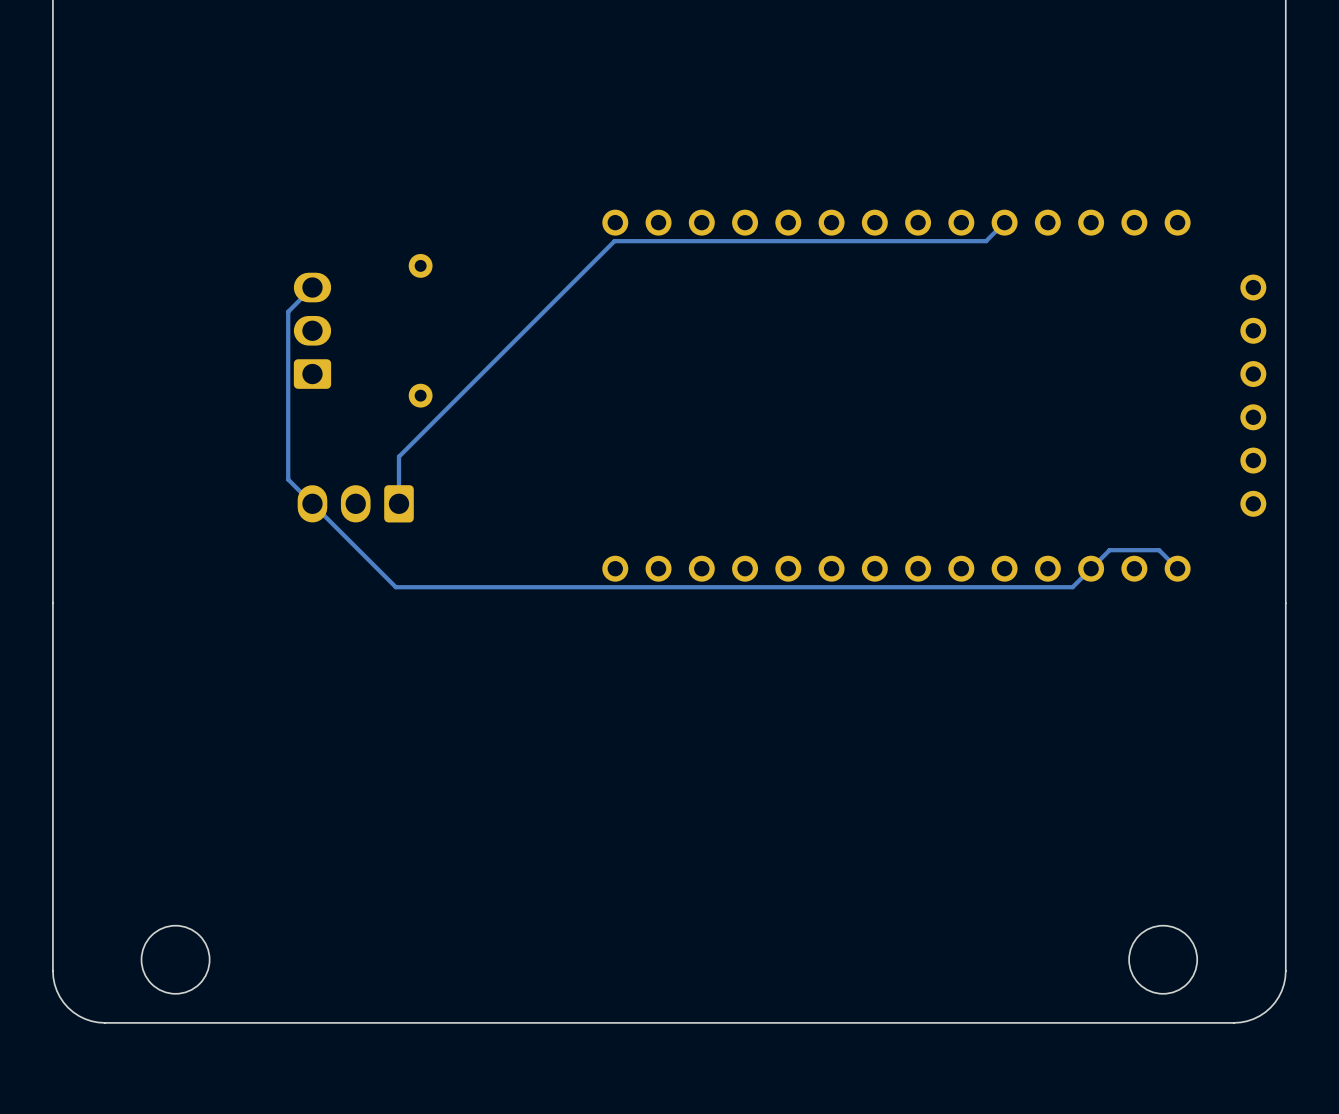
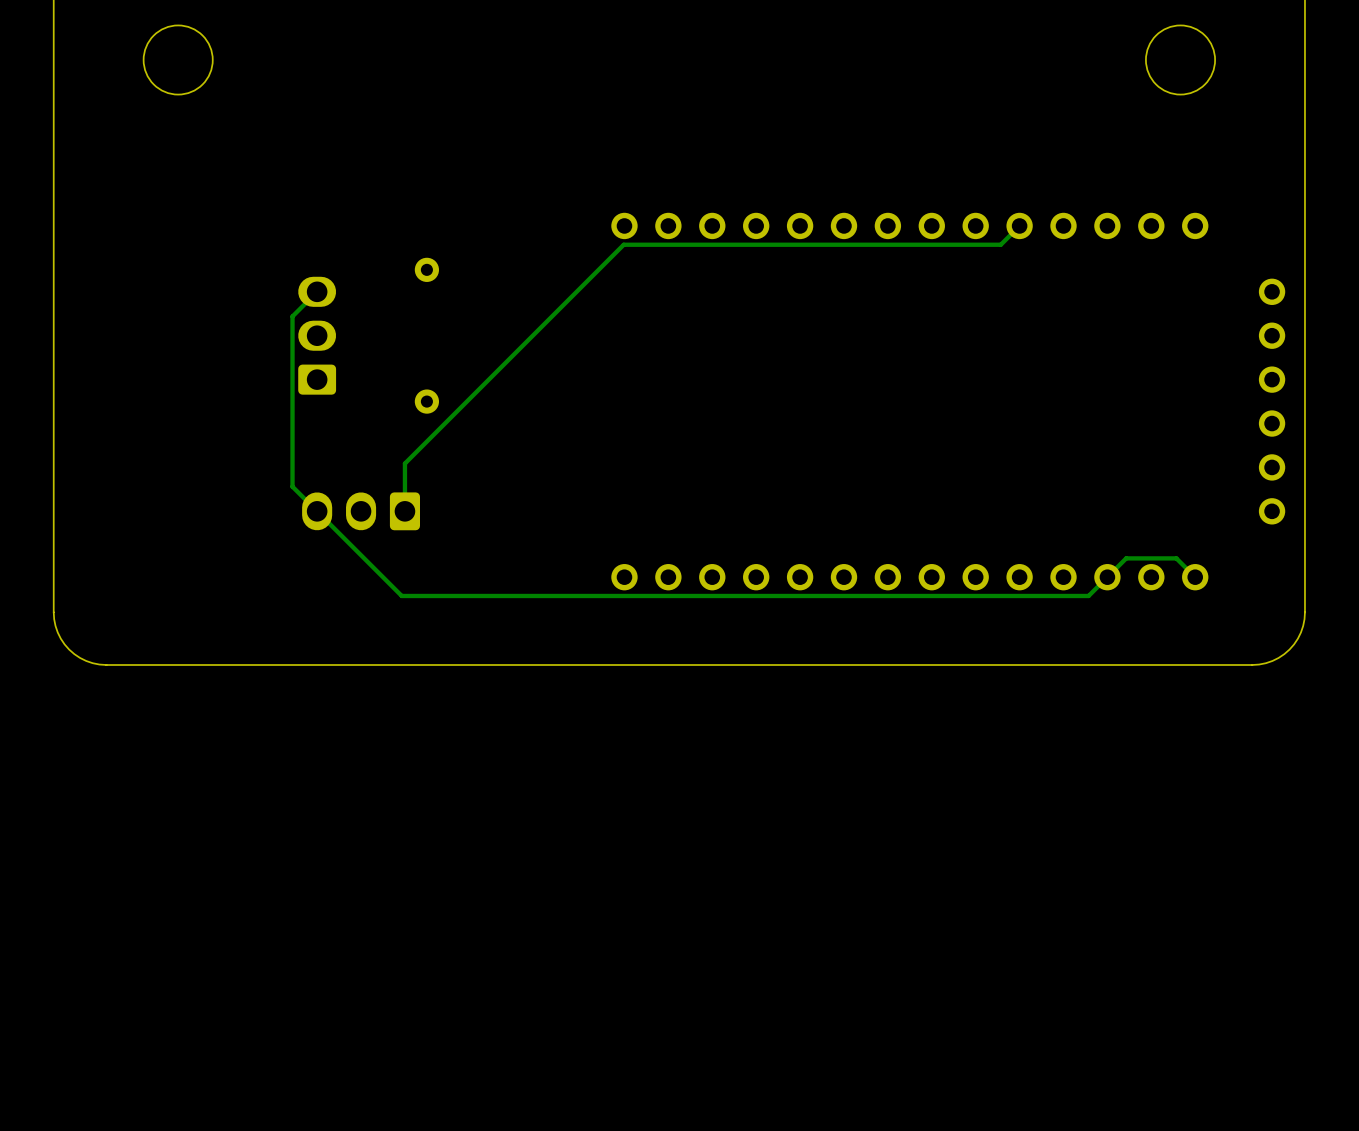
round board edge: none -> [142, 24, 214, 96]
round board edge: none -> [1145, 24, 1216, 96]
board edge: (1285, 603) (1285, 977) (1281, 990) (1270, 1007) (1253, 1018) (1233, 1022) (104, 1022) (84, 1018) (73, 1012) (63, 1002) (56, 990) (53, 977) (52, 603) -> (1304, 612) (1300, 632) (1289, 649) (1272, 660) (1252, 665) (106, 665) (86, 660) (69, 649) (57, 632) (53, 612)
round board edge: [140, 924, 211, 995] -> none
round board edge: [1128, 924, 1199, 995] -> none

